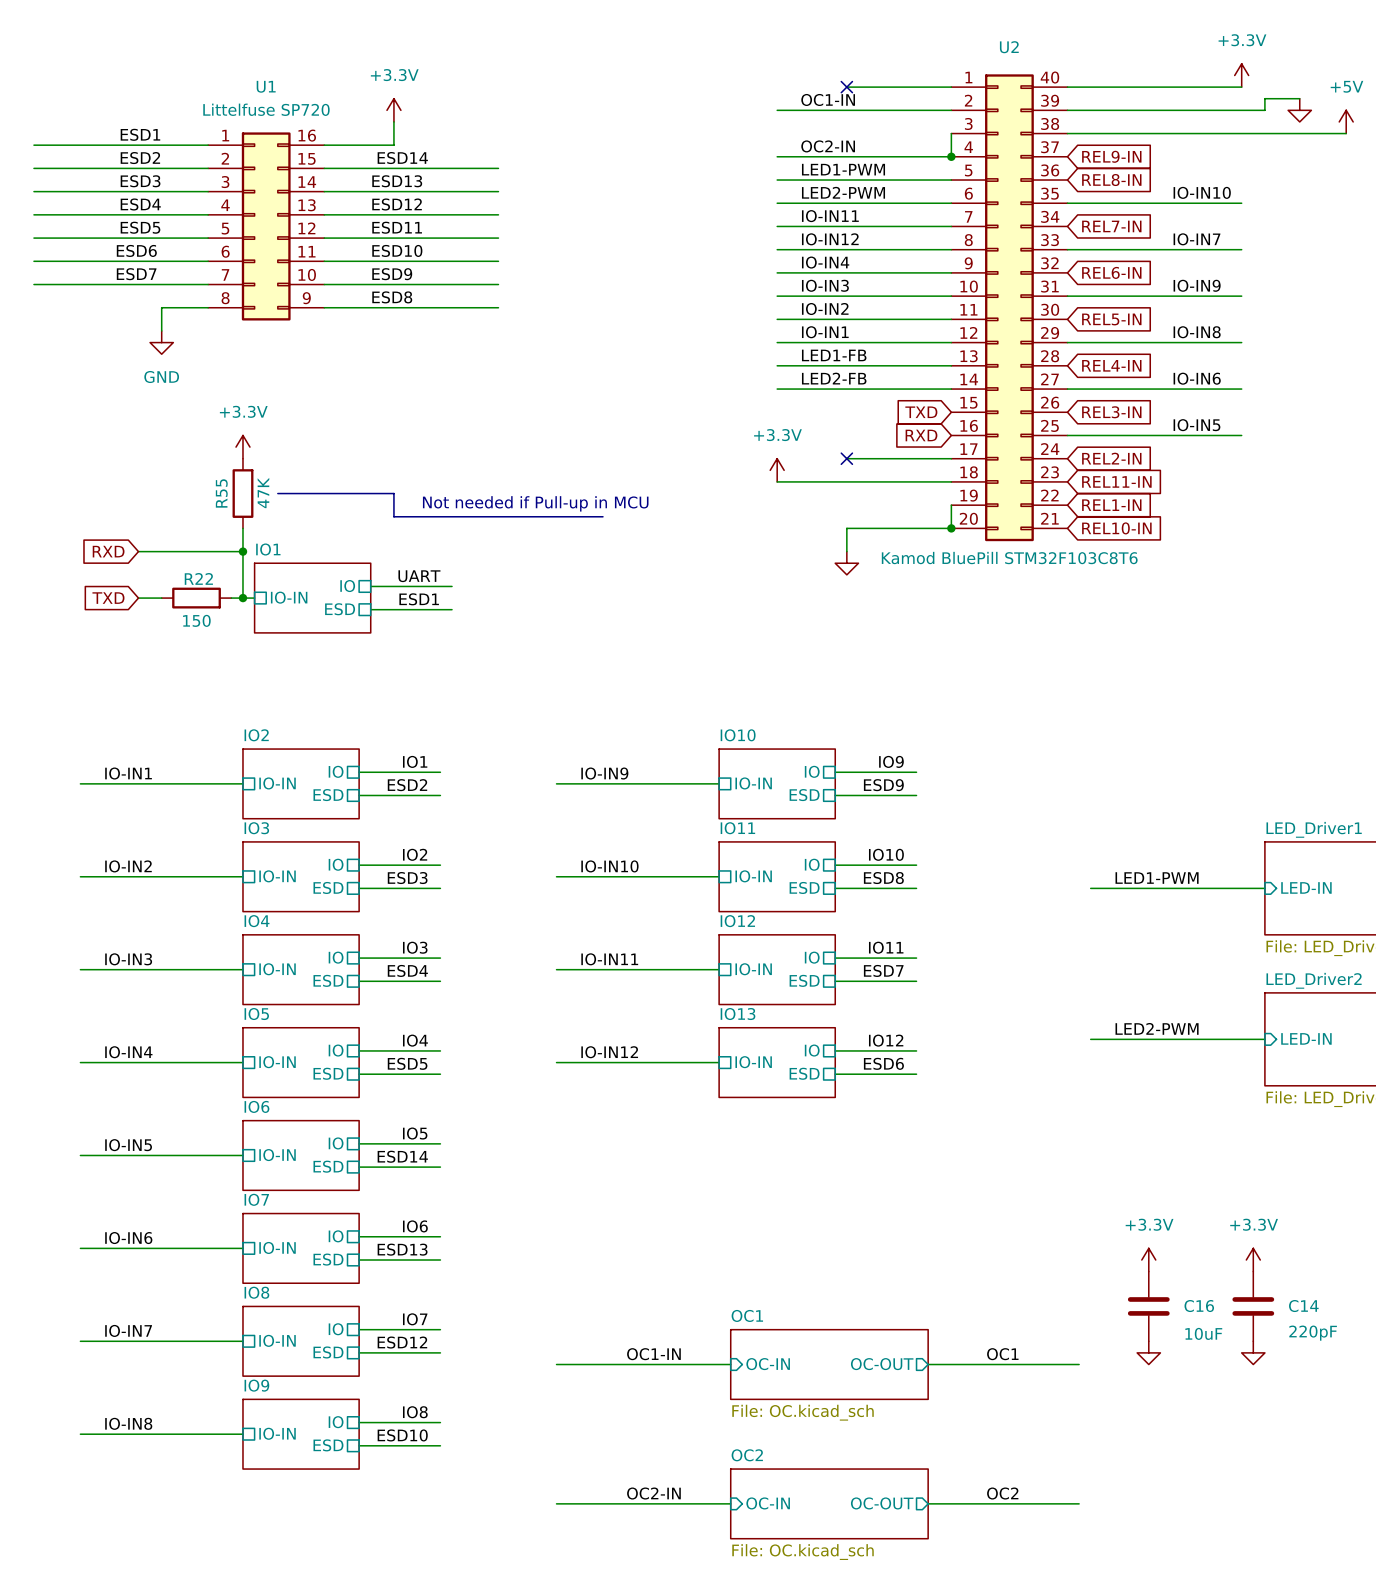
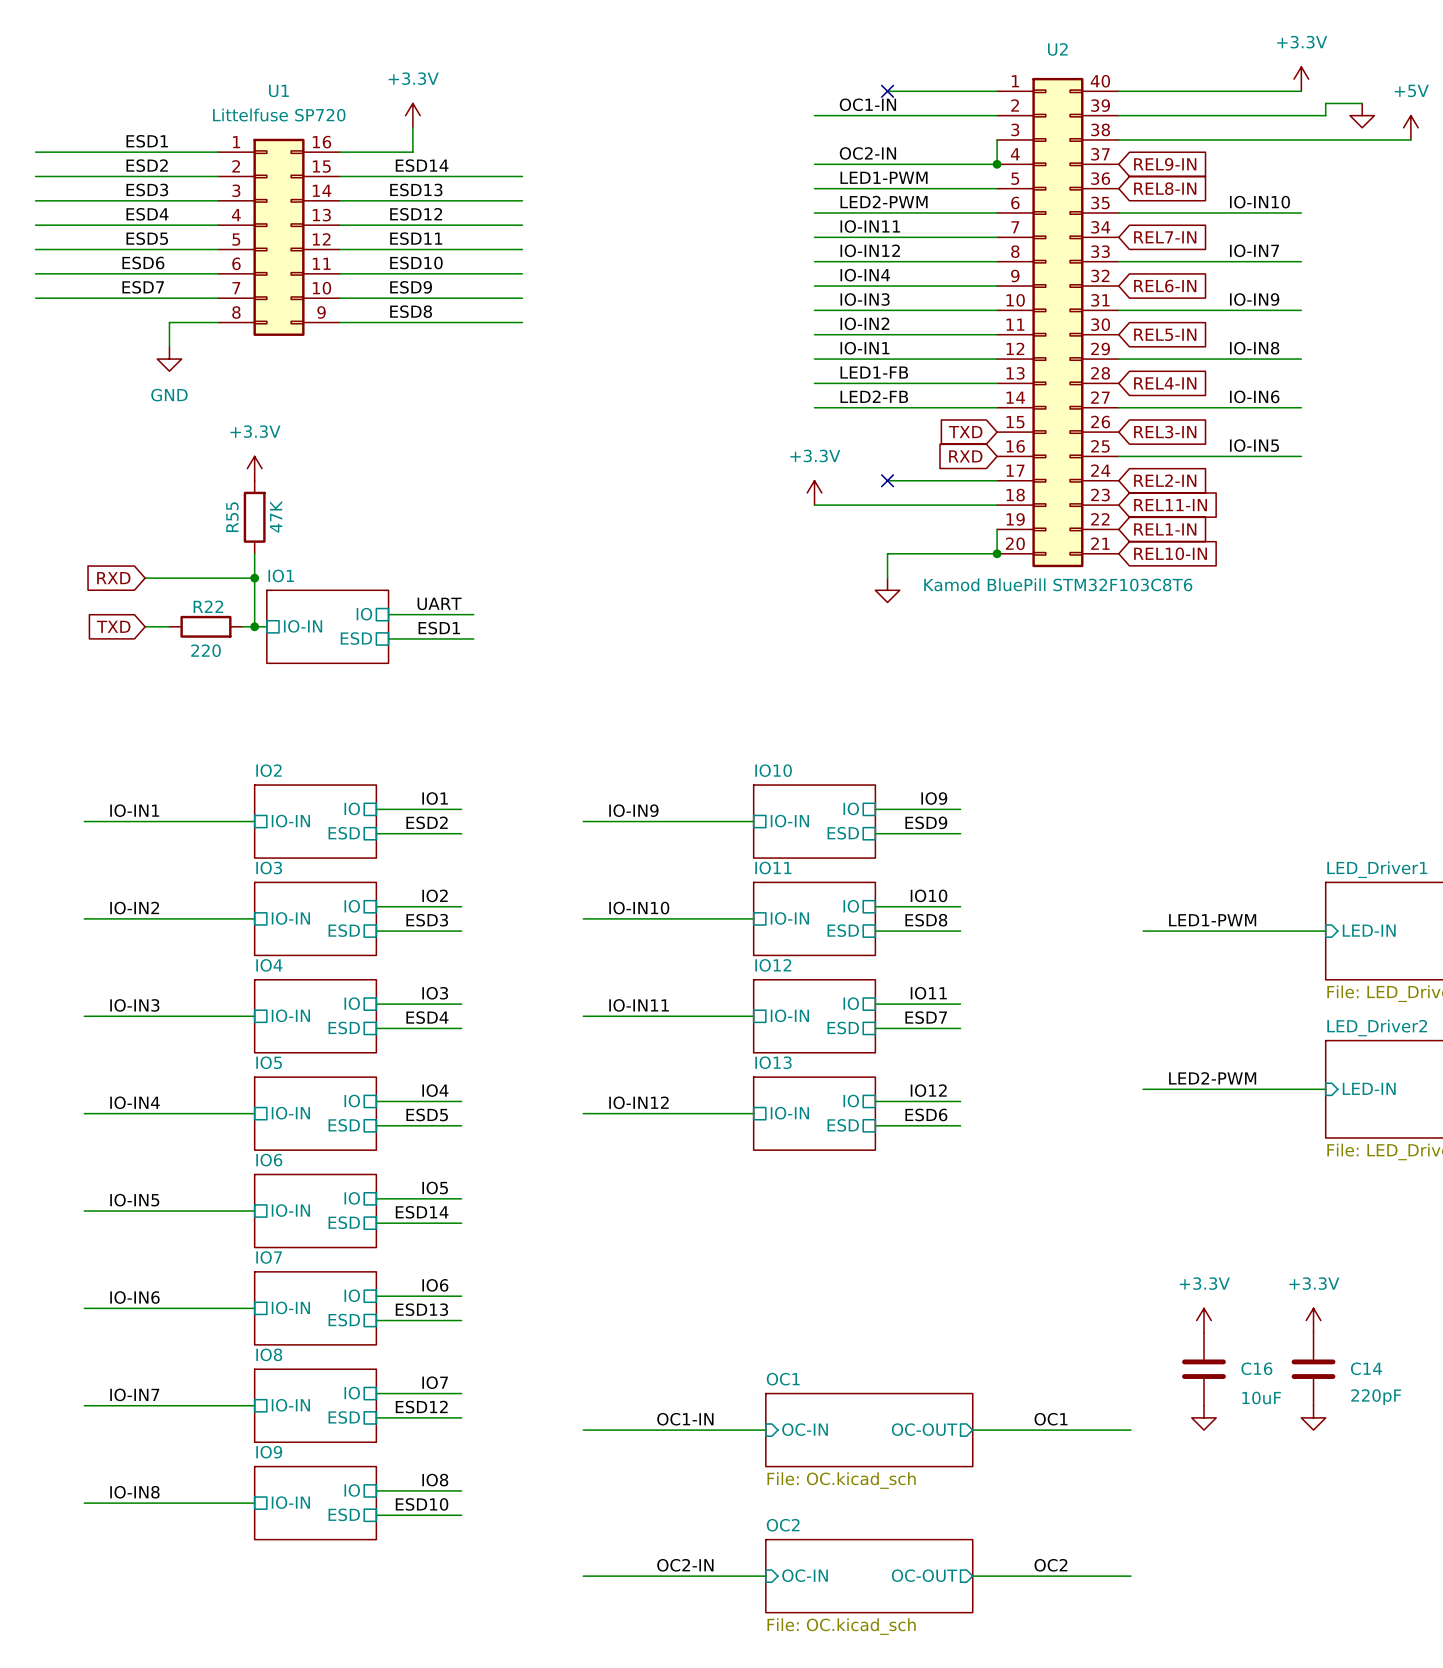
line: (277, 493) (393, 493) (393, 516) (602, 516) -> none
text: Not needed if Pull-up in MCU (535, 503) -> none
R22 value: 150 (196, 620) -> 220 (206, 650)

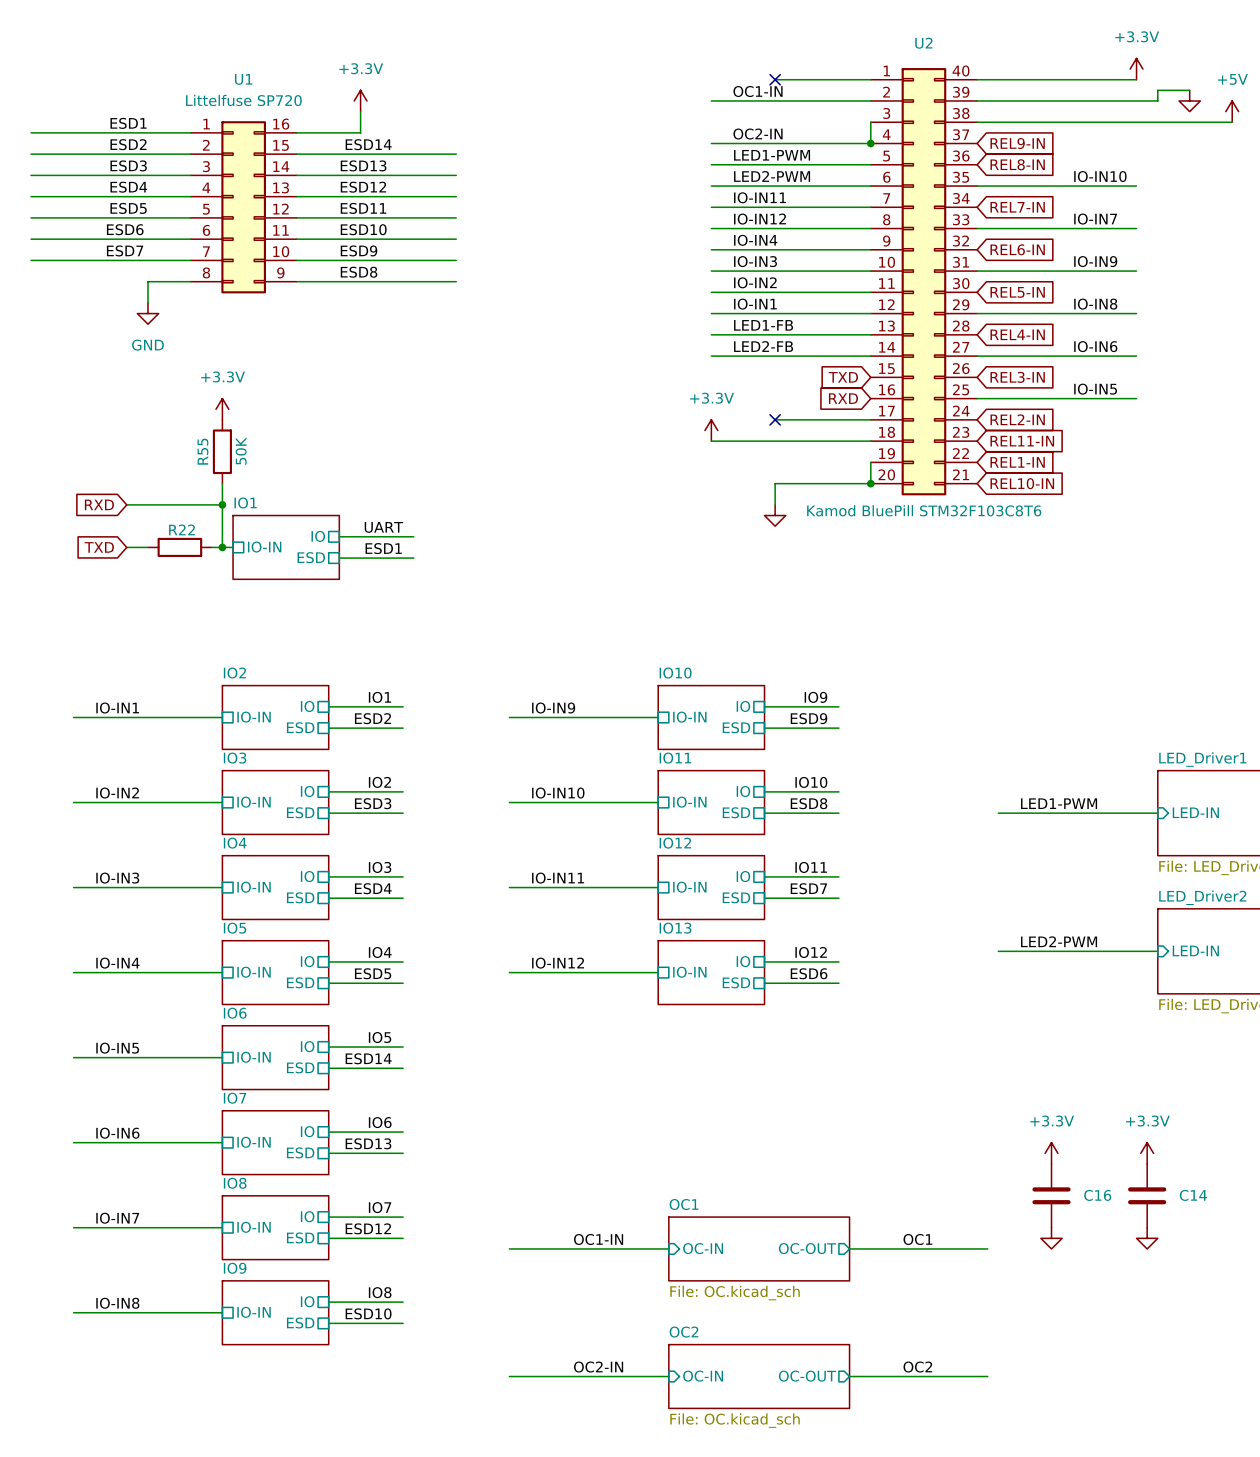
R55 value: 47K (276, 516) -> 50K (241, 451)
R22 value: 220 (206, 650) -> none
C16 value: 10uF (1261, 1397) -> none
C14 value: 220pF (1376, 1397) -> none

